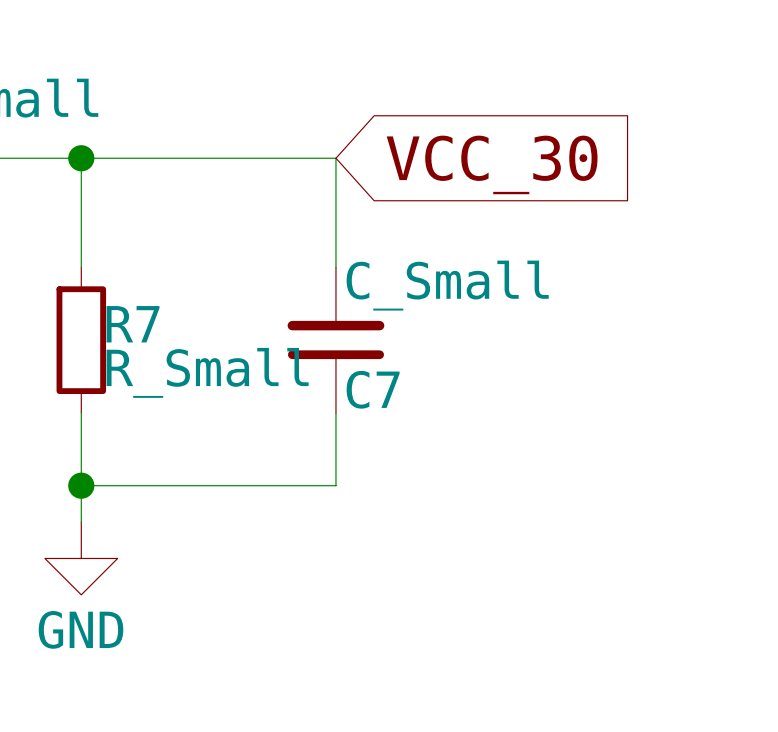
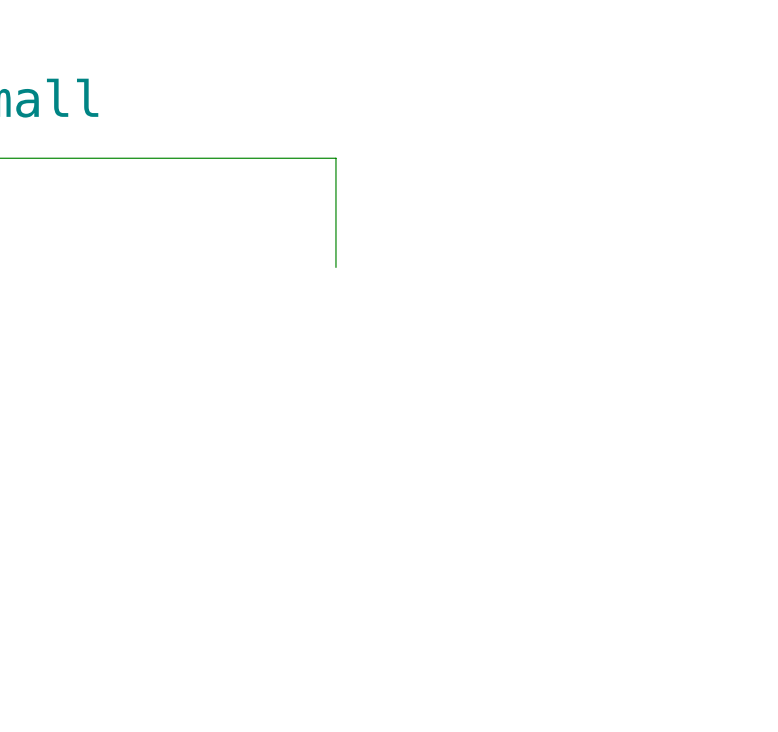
wire: (81, 158) (81, 267) -> none
junction: (81, 158) -> none
global label: VCC_30 (492, 164) -> none
R7: R_Small (81, 340) -> none
C7: C_Small (335, 340) -> none
wire: (81, 412) (81, 522) -> none
wire: (335, 412) (335, 485) (81, 485) -> none
junction: (81, 485) -> none
power symbol: GND (81, 558) -> none

